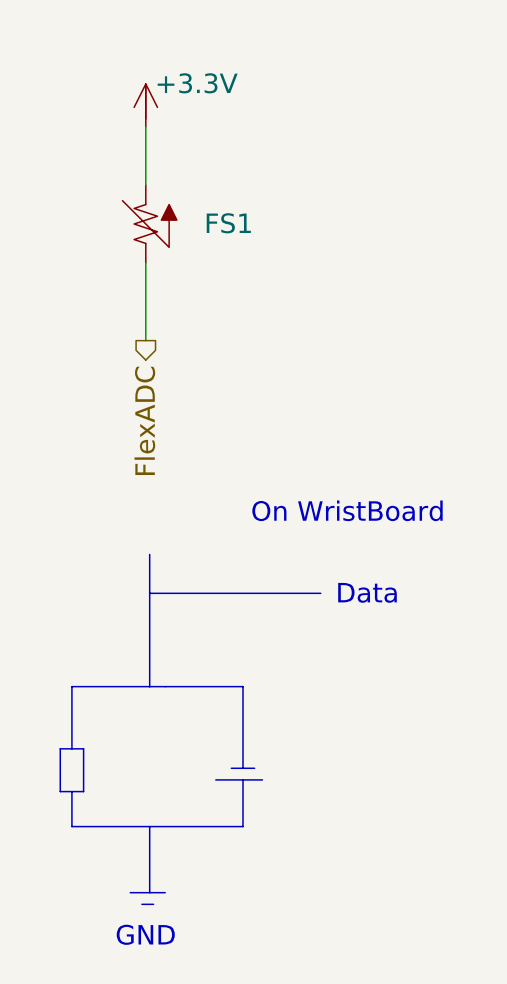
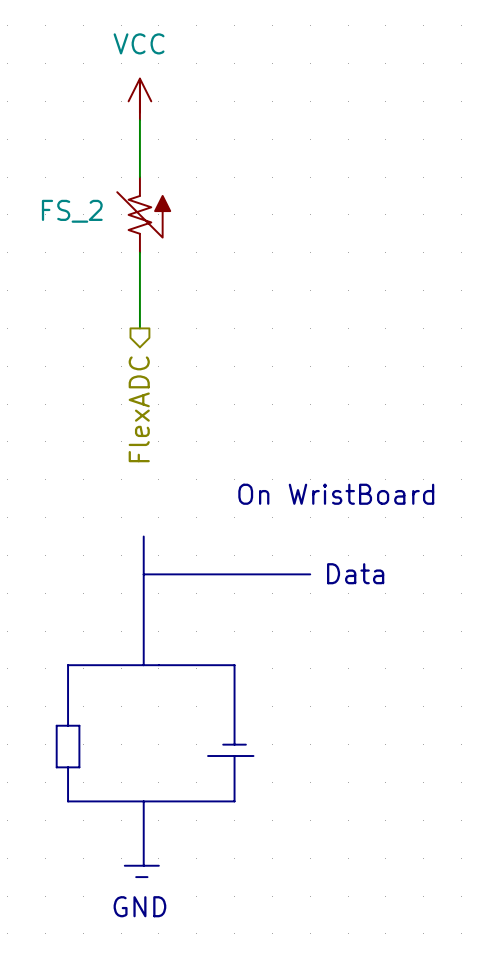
power symbol: +3.3V (145, 105) -> VCC (139, 99)
FS1 name: FS1 (228, 223) -> FS_2 (72, 211)

